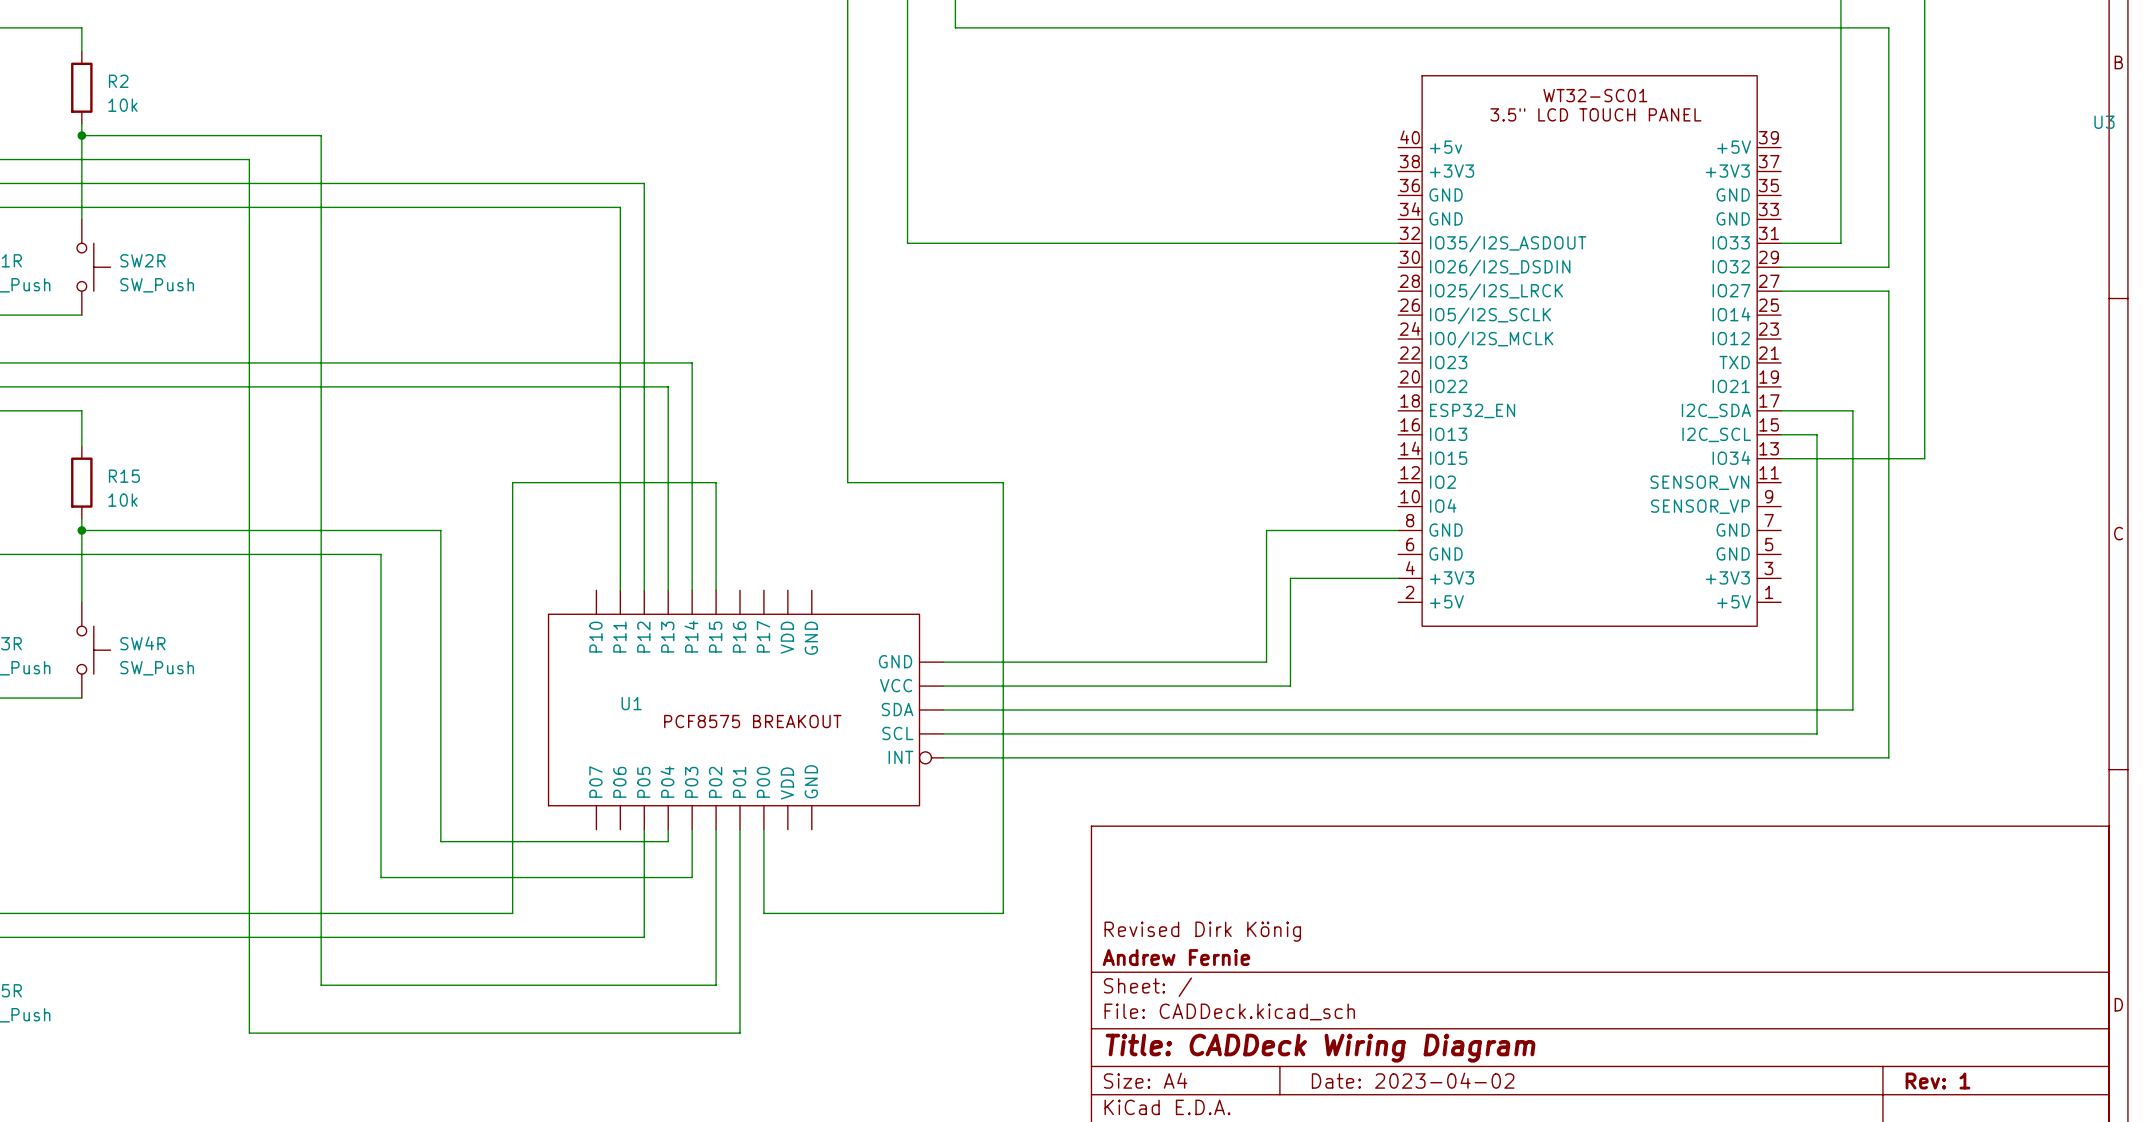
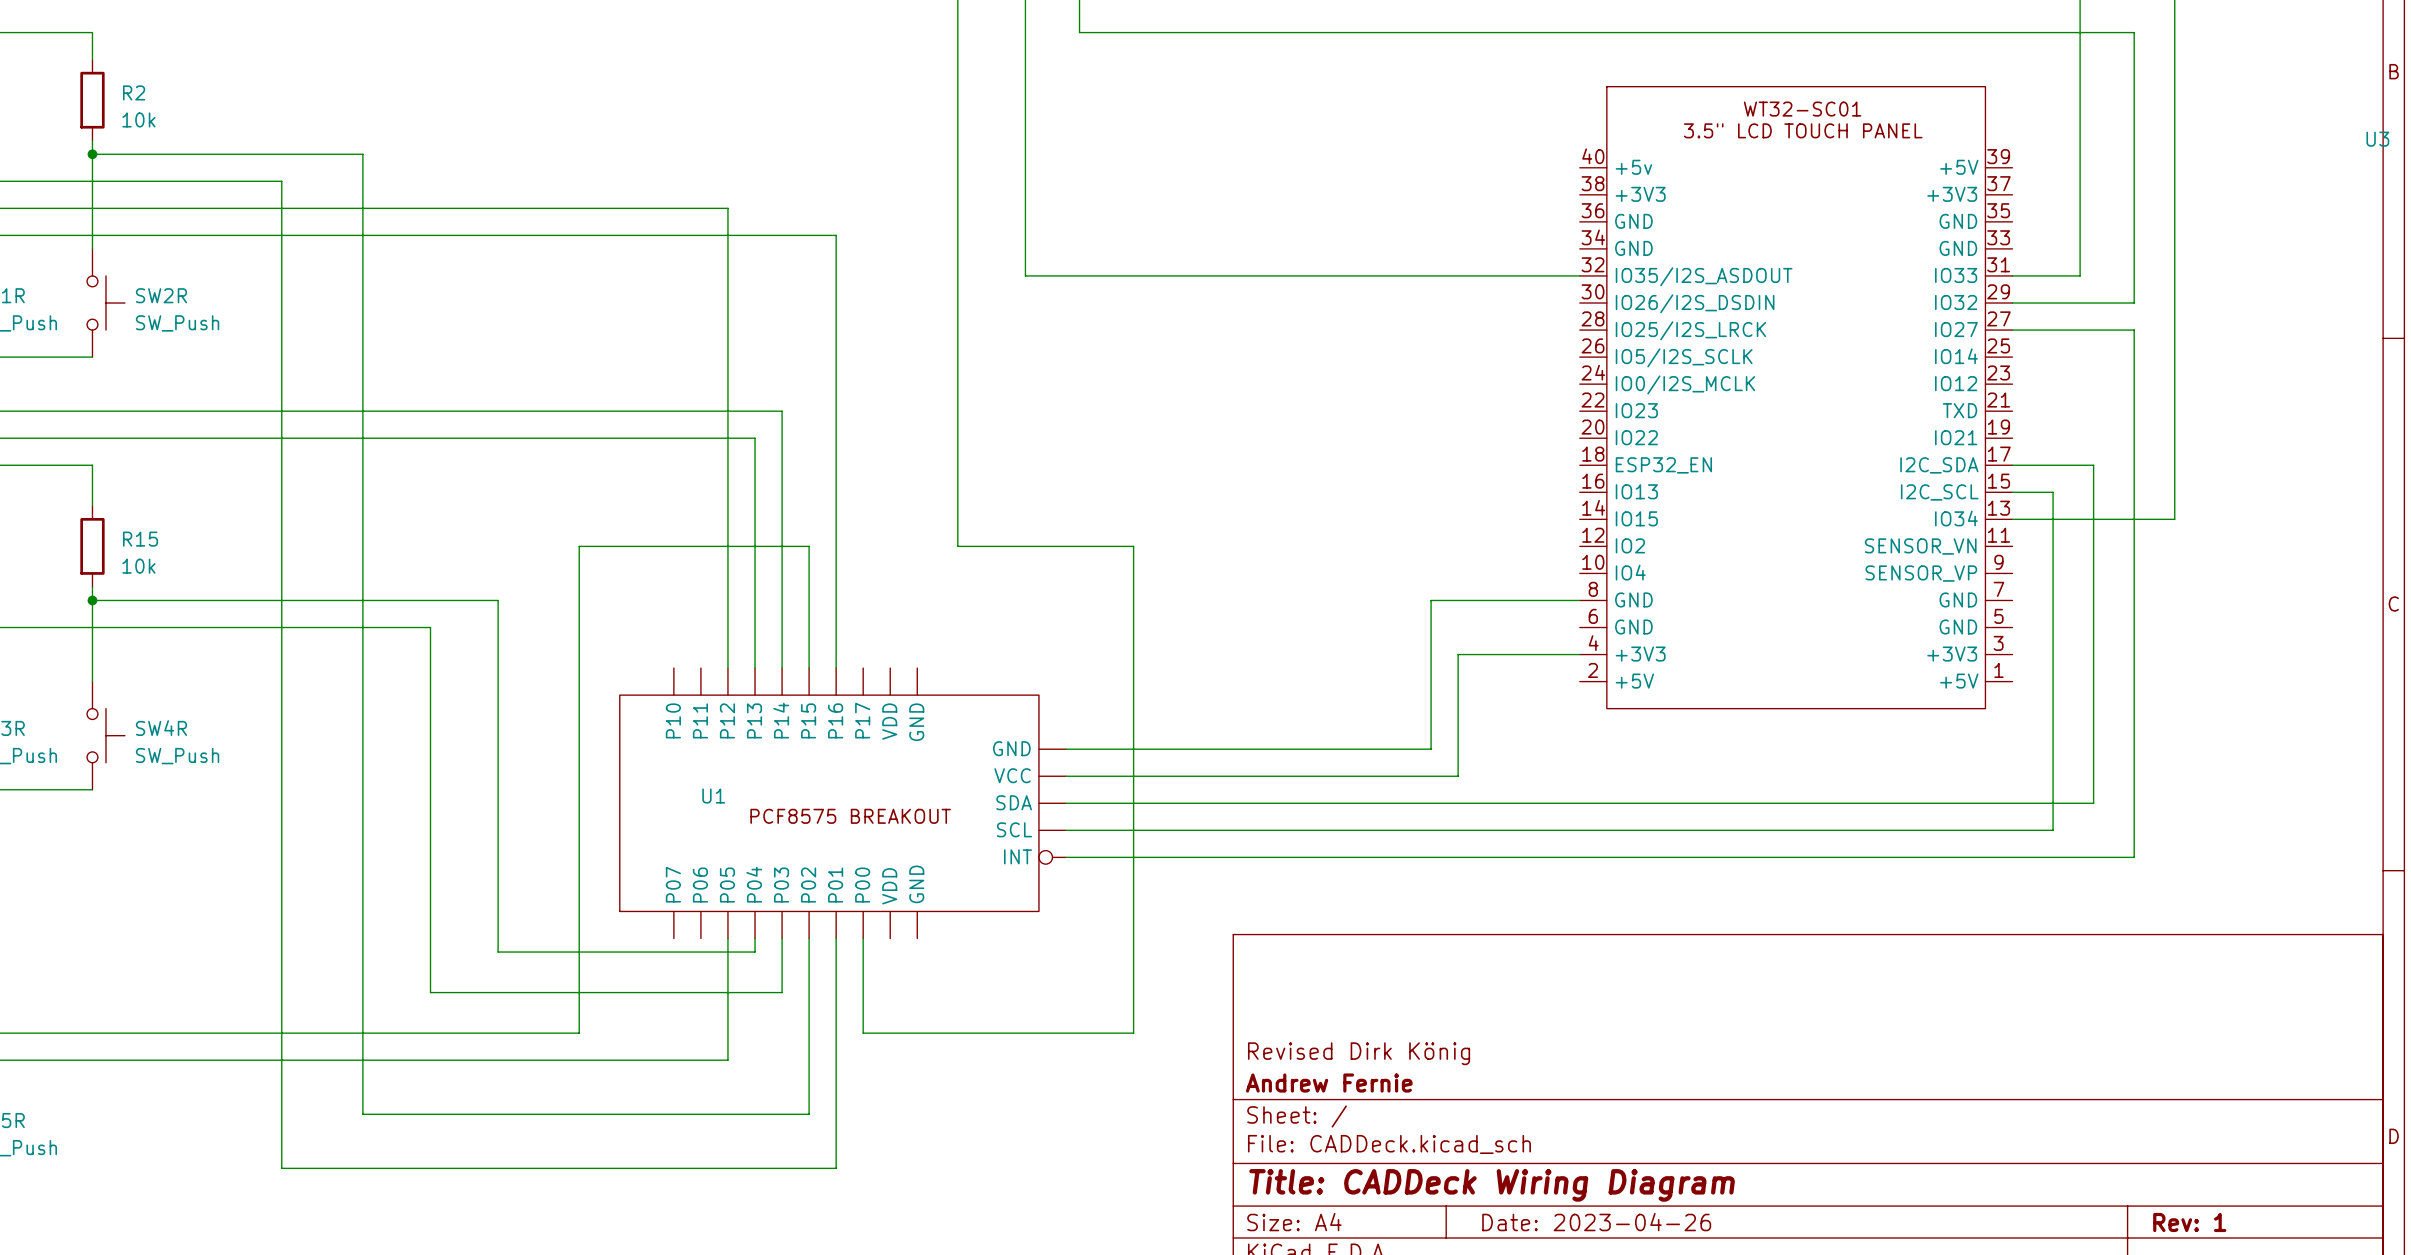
wire: (620, 207) (620, 590) -> (700, 235) (836, 235) (836, 668)
title block: Date: 2023-04-02 (1413, 1080) -> Date: 2023-04-26 (1596, 1222)

